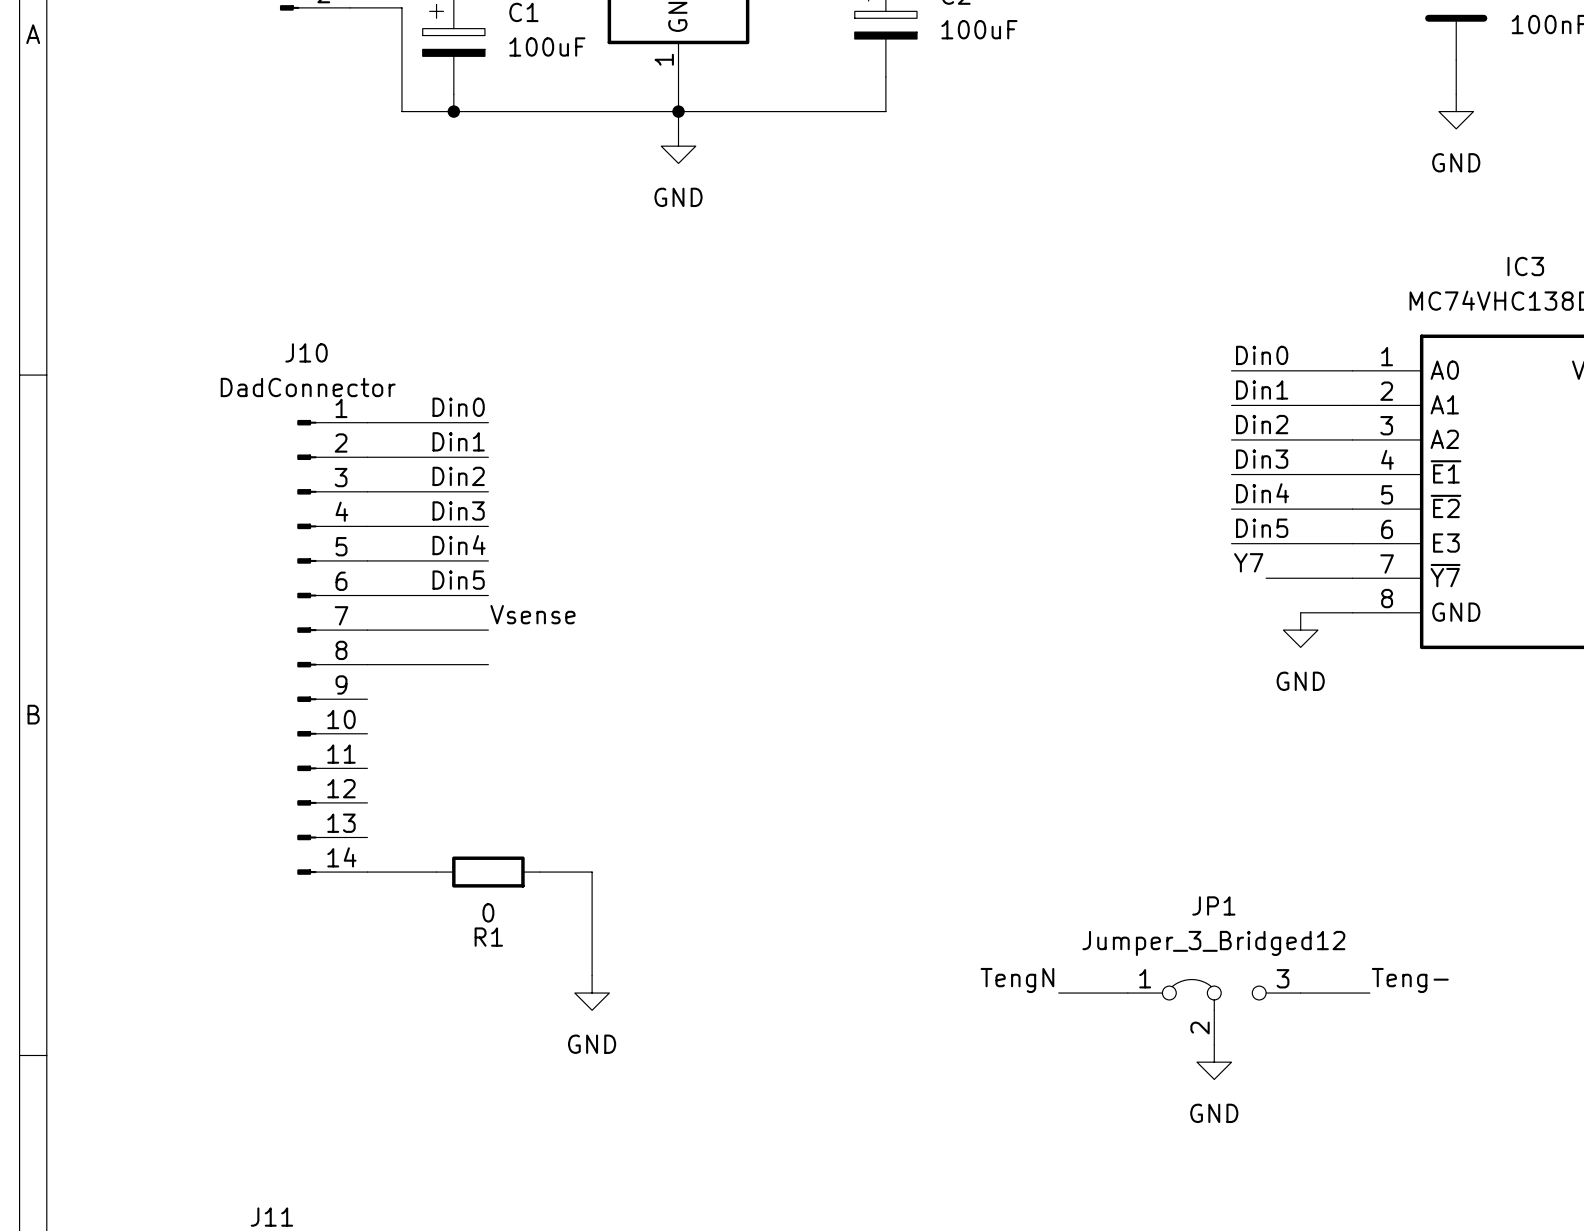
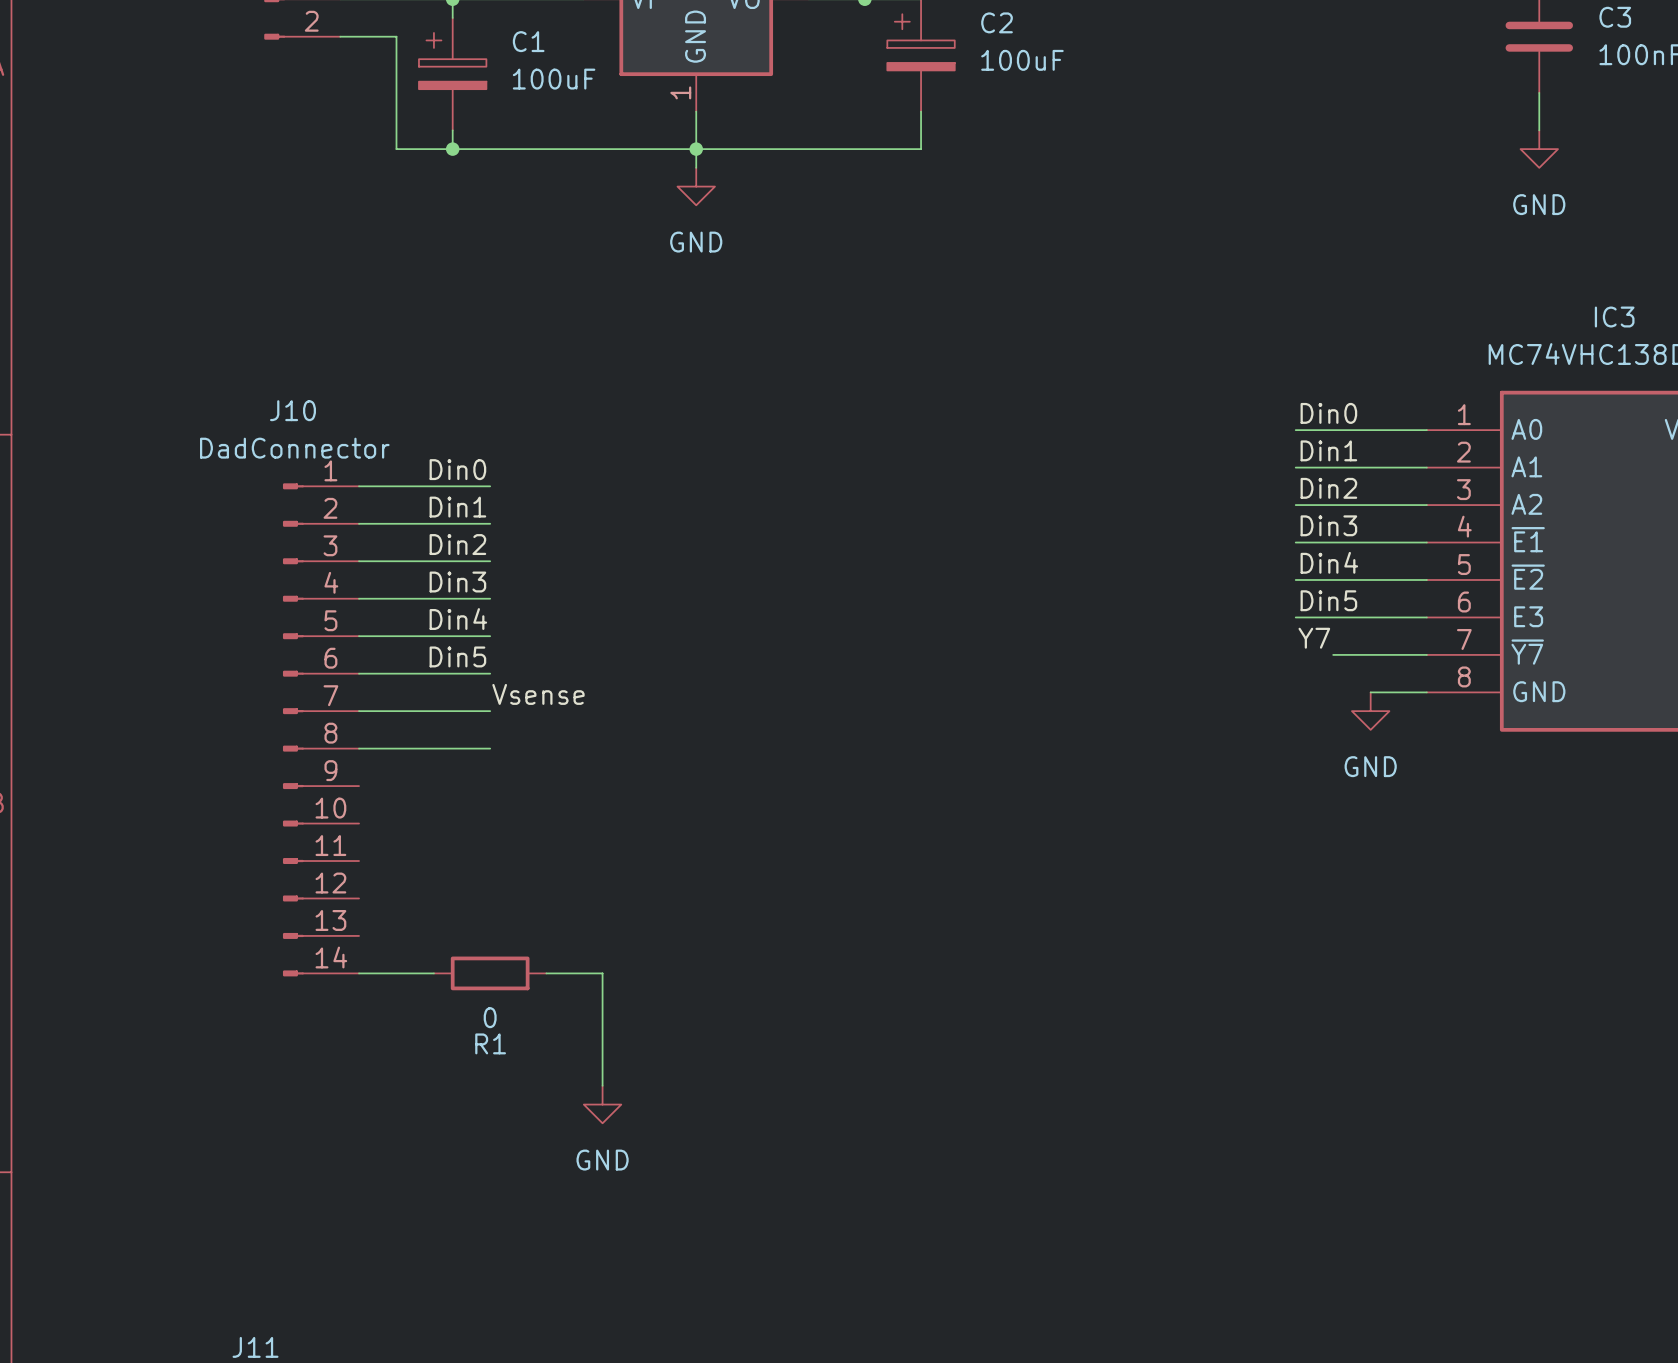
label: TengN (1017, 980) -> none
label: Teng- (1410, 980) -> none
wire: (1058, 993) (1127, 993) -> none
wire: (1300, 993) (1369, 993) -> none
JP1: Jumper_3_Bridged12 (1214, 1012) -> none
power symbol: GND (1214, 1062) -> none

